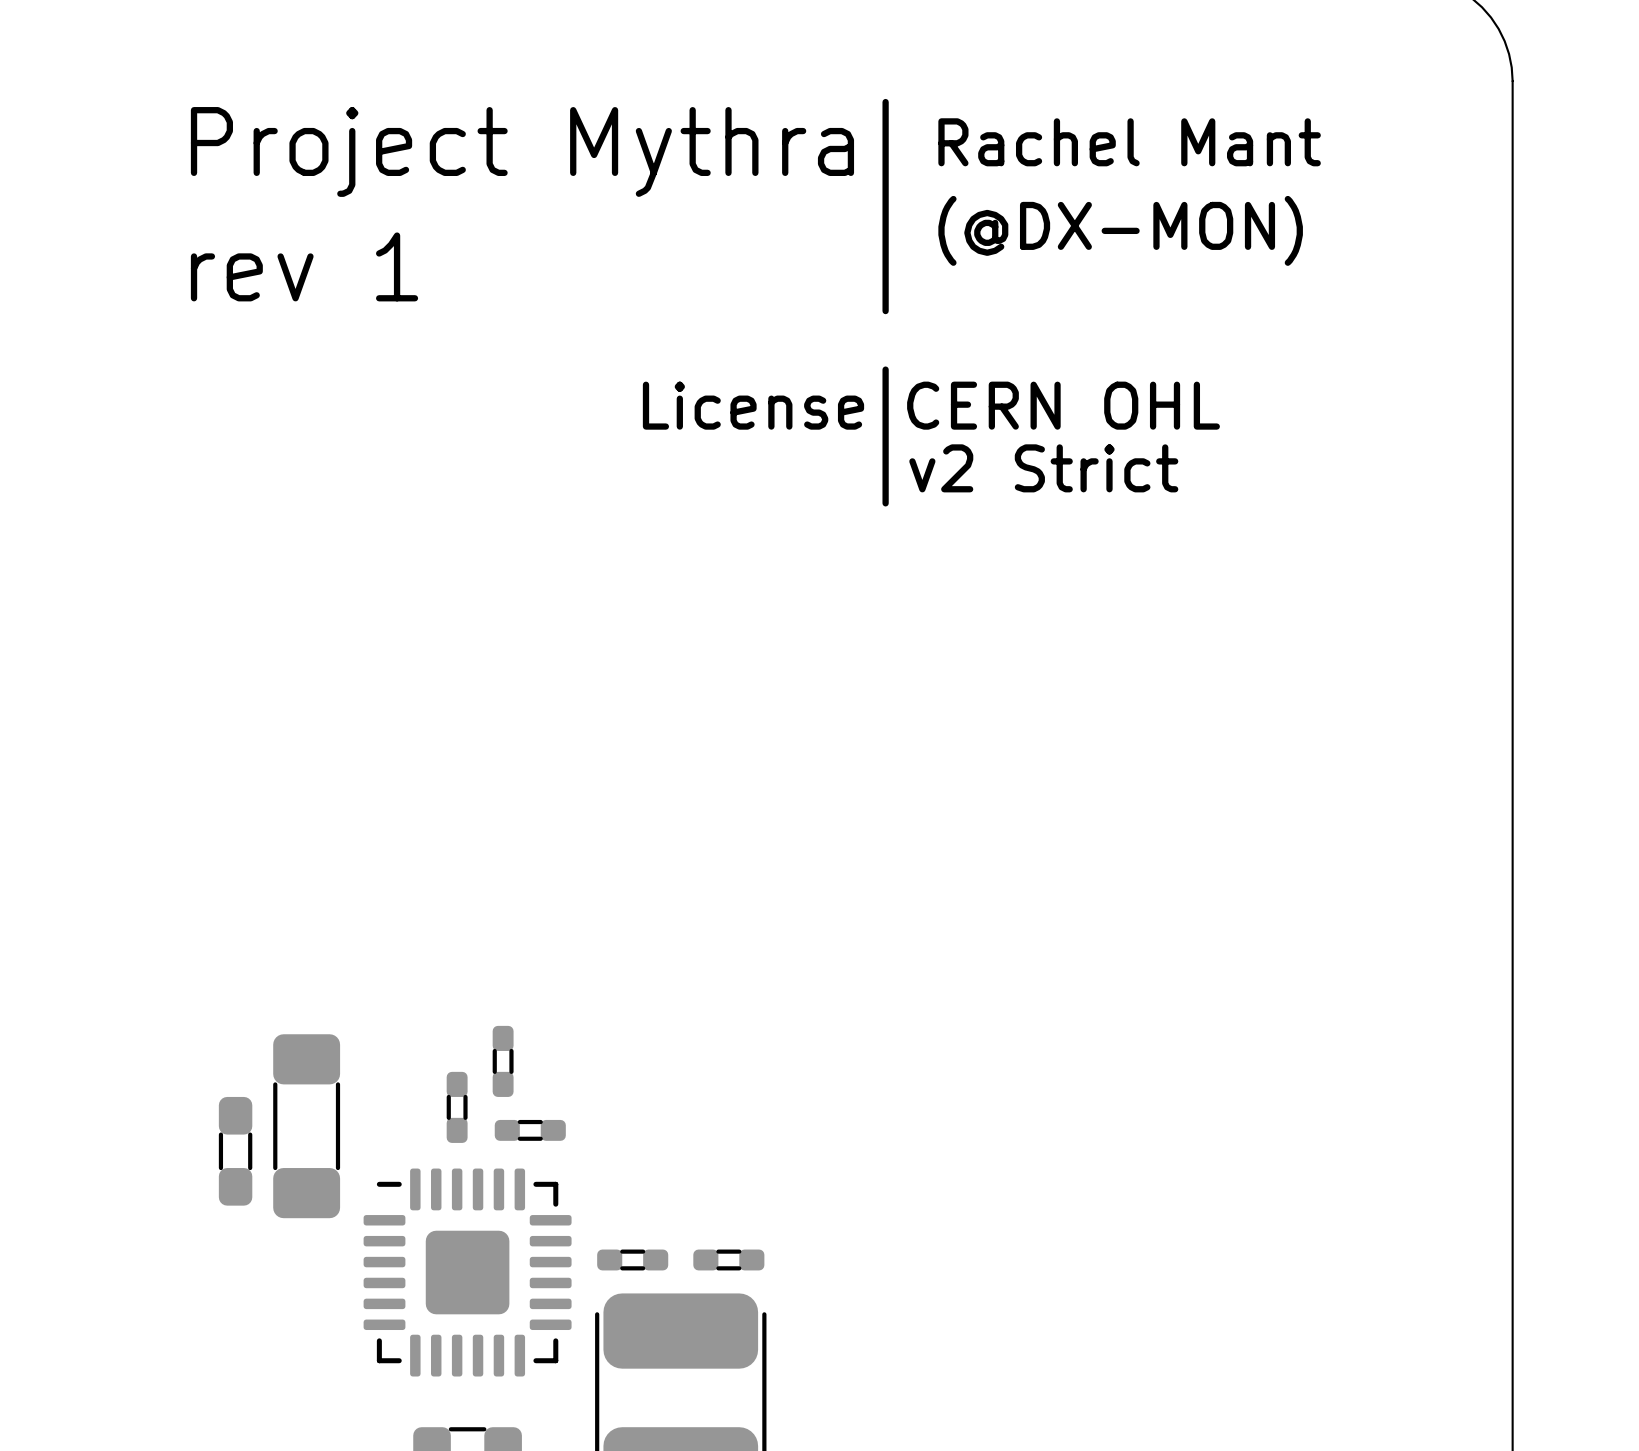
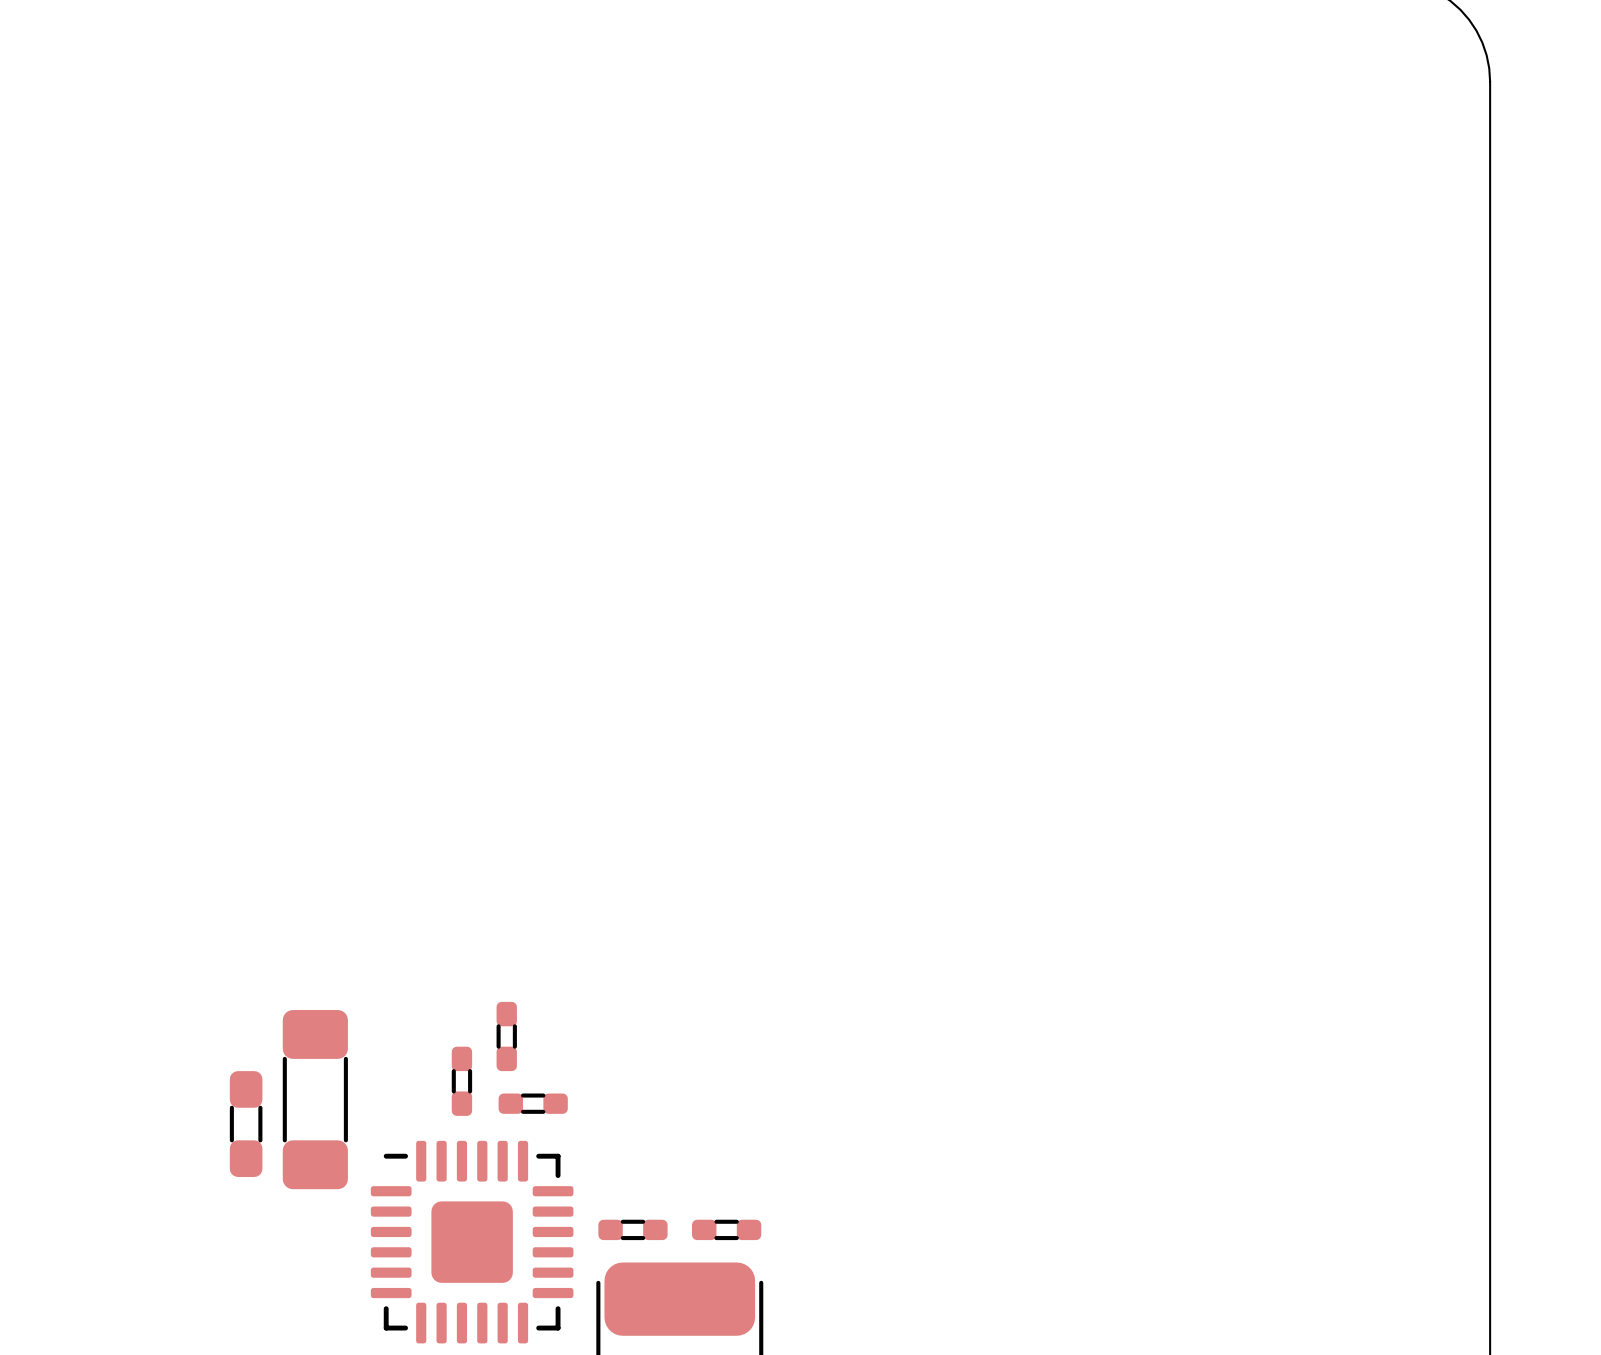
line: (885, 102) (885, 311) -> none
text: Rachel Mant (1129, 142) -> none
text: Project Mythra (522, 151) -> none
text: (@DX-MON) (1120, 230) -> none
text: rev 1 (304, 266) -> none
line: (885, 369) (885, 503) -> none
text: License (753, 405) -> none
text: CERN OHL (1063, 405) -> none
text: v2 Strict (1043, 468) -> none

